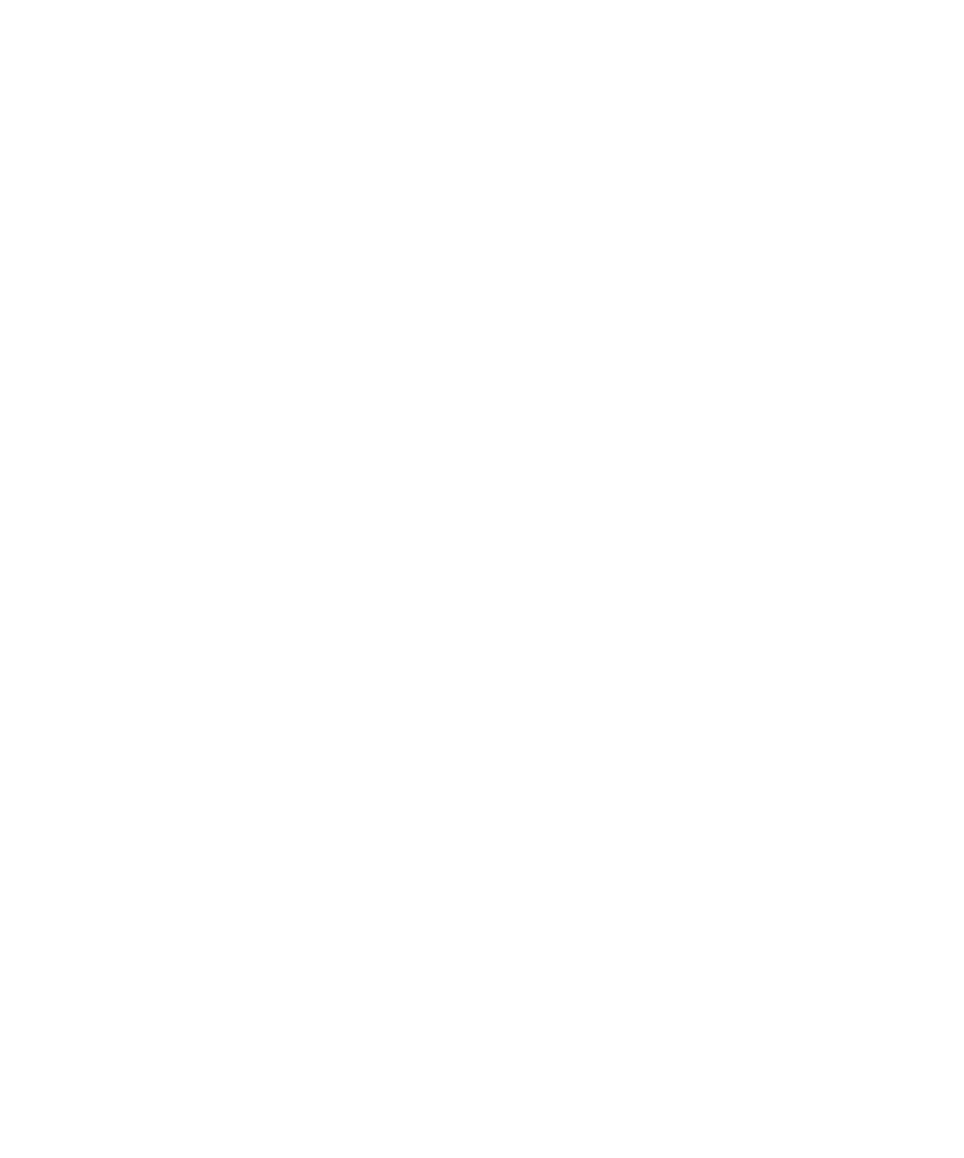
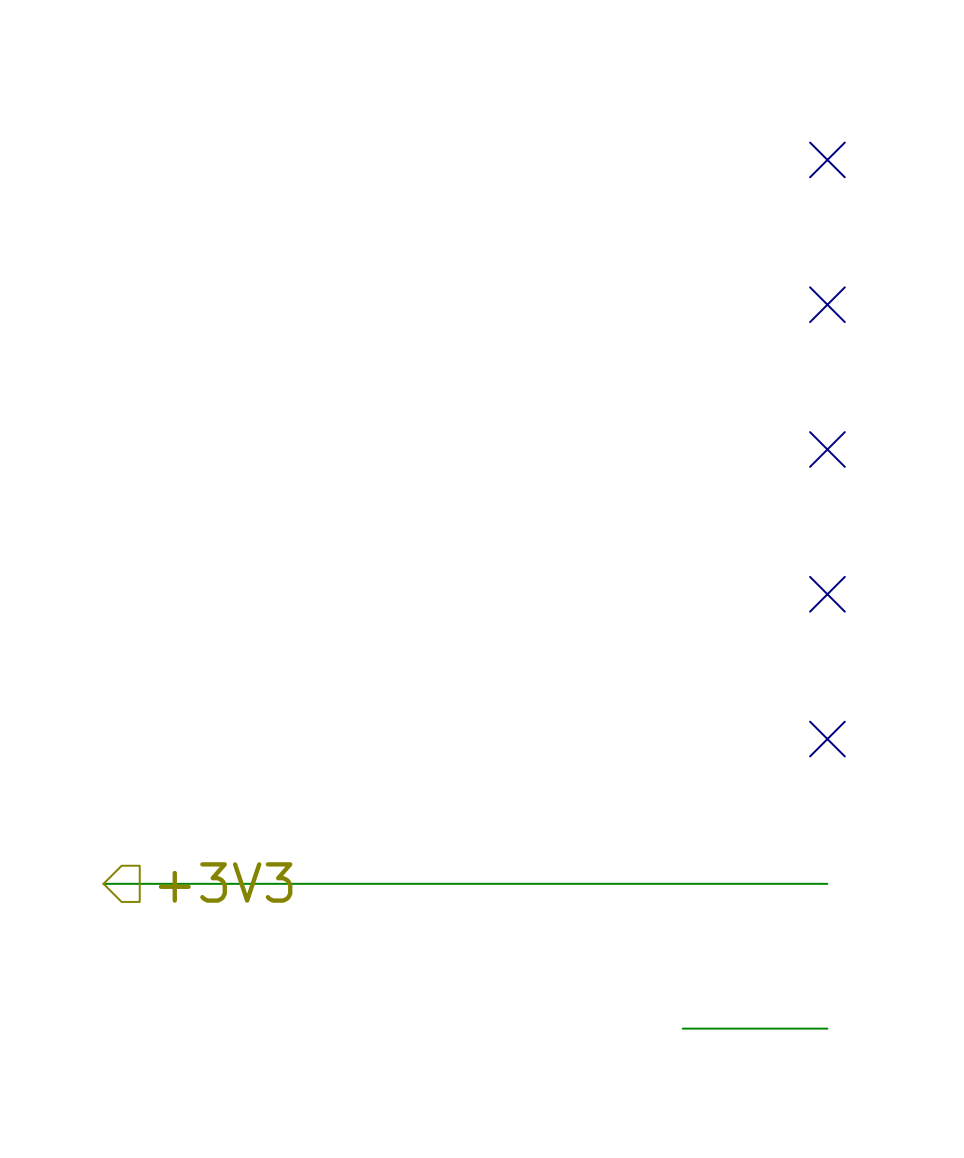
no-connect mark: none -> (827, 159)
no-connect mark: none -> (827, 304)
no-connect mark: none -> (827, 449)
no-connect mark: none -> (827, 594)
no-connect mark: none -> (827, 739)
hierarchical label: none -> +3V3 (225, 882)
wire: none -> (103, 883) (827, 883)
wire: none -> (682, 1028) (827, 1028)

